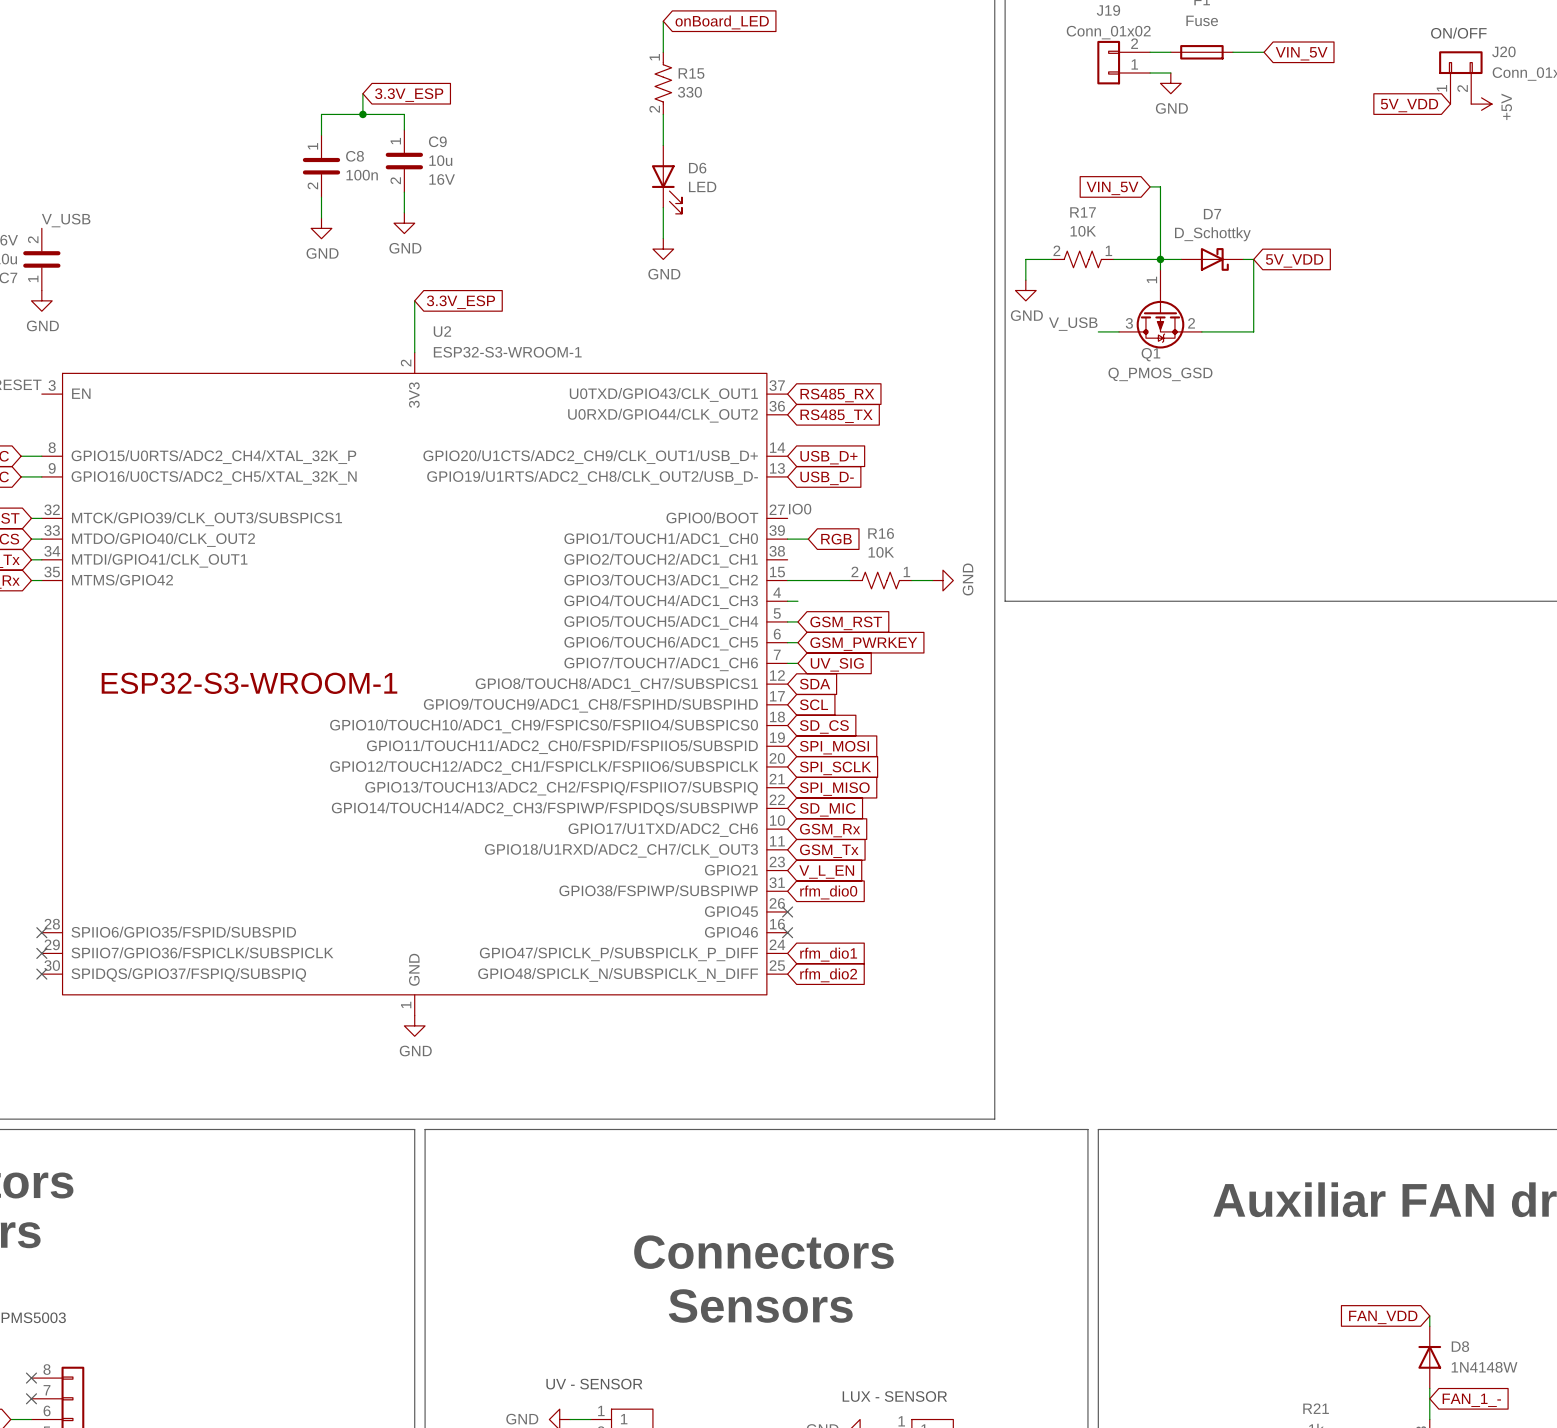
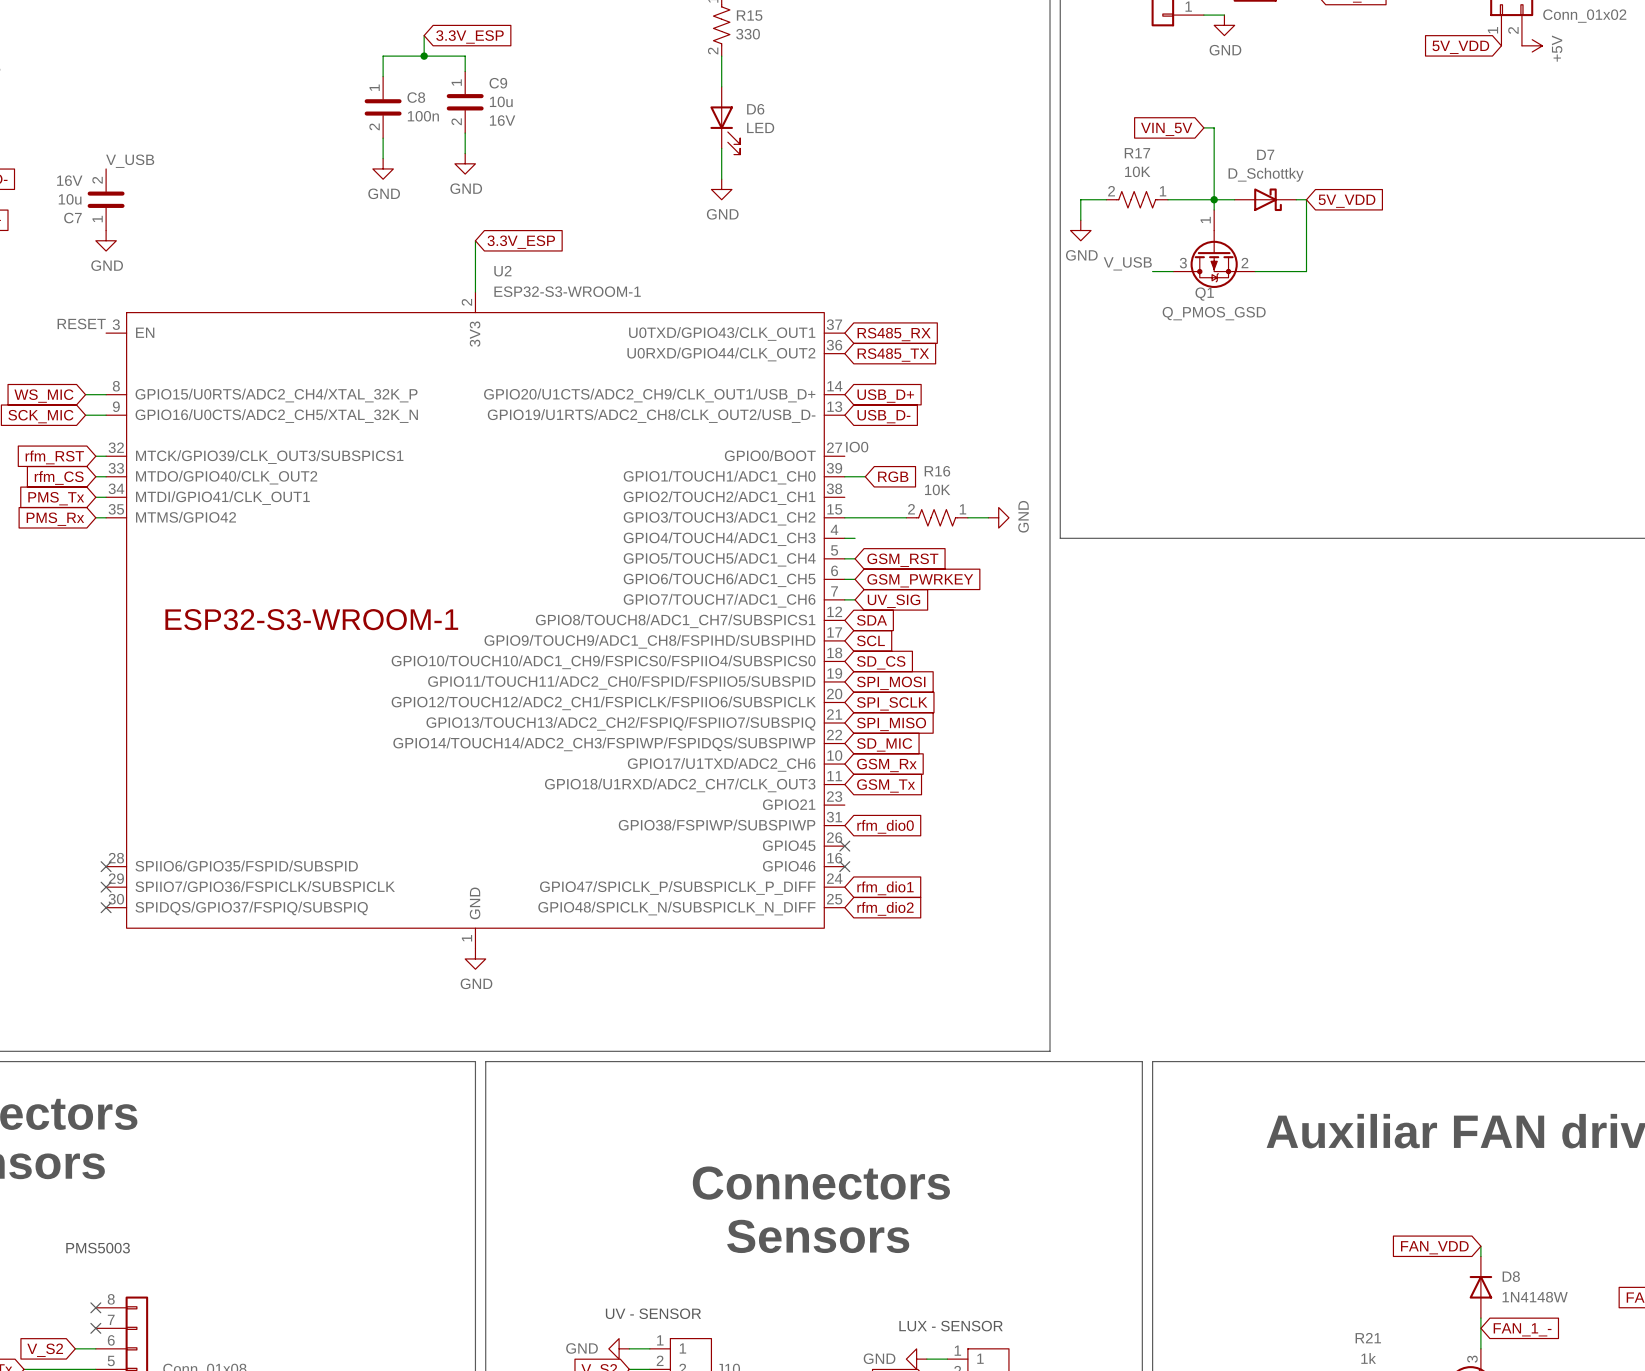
global label: V_L_EN (826, 872) -> none

